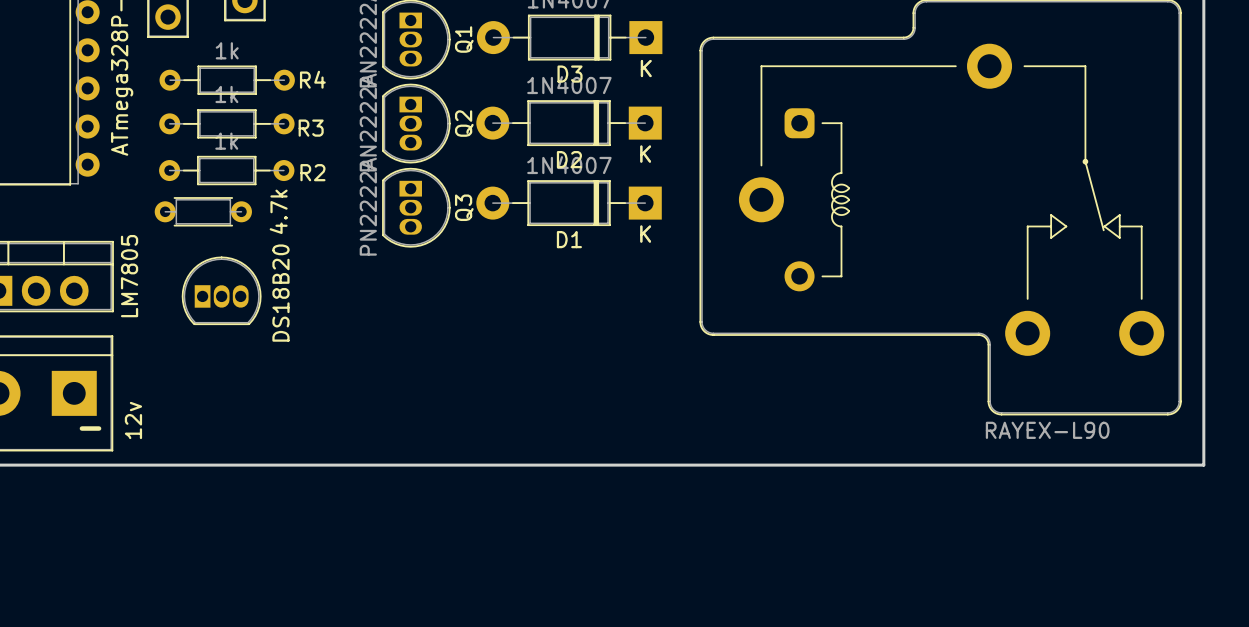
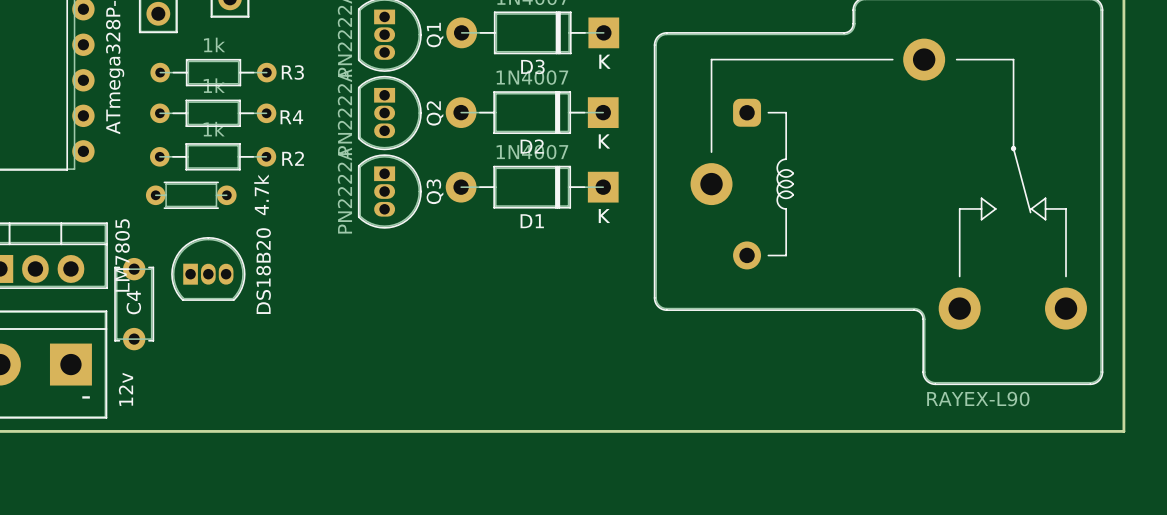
R4 name: R4 (312, 79) -> R3 (292, 72)
R3 name: R3 (311, 128) -> R4 (291, 117)
C4: none -> (134, 304)

